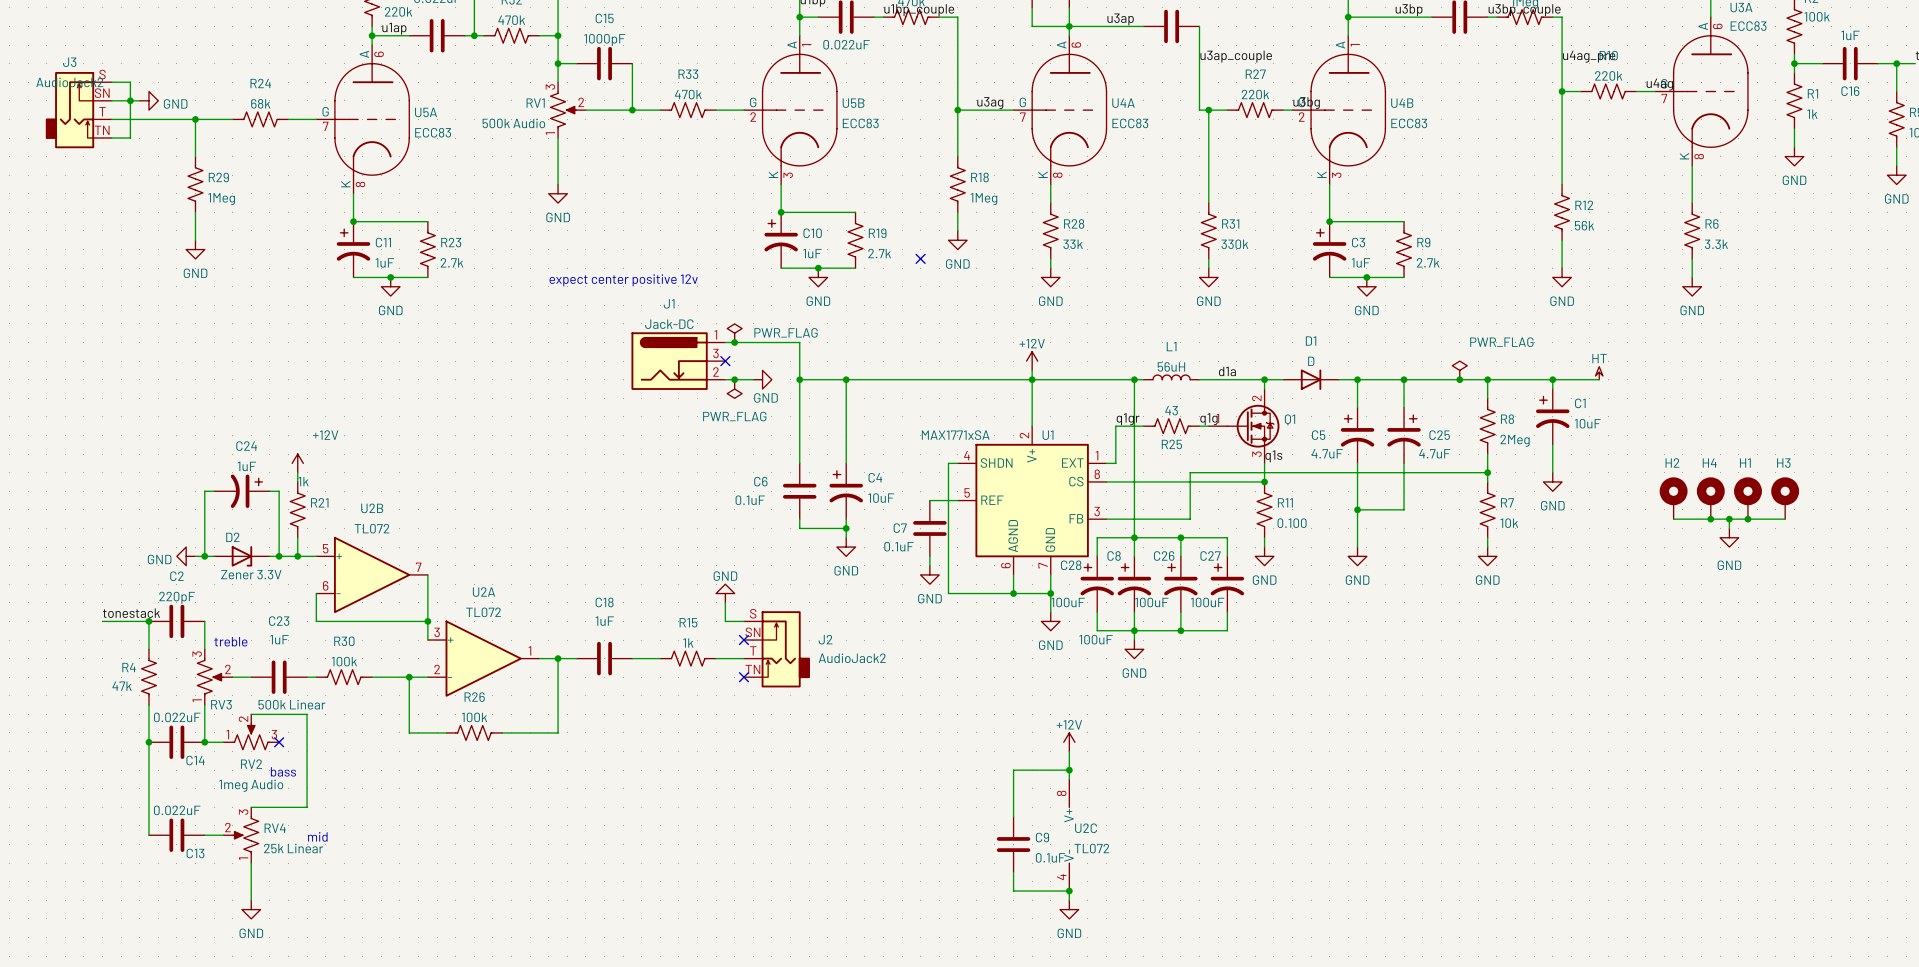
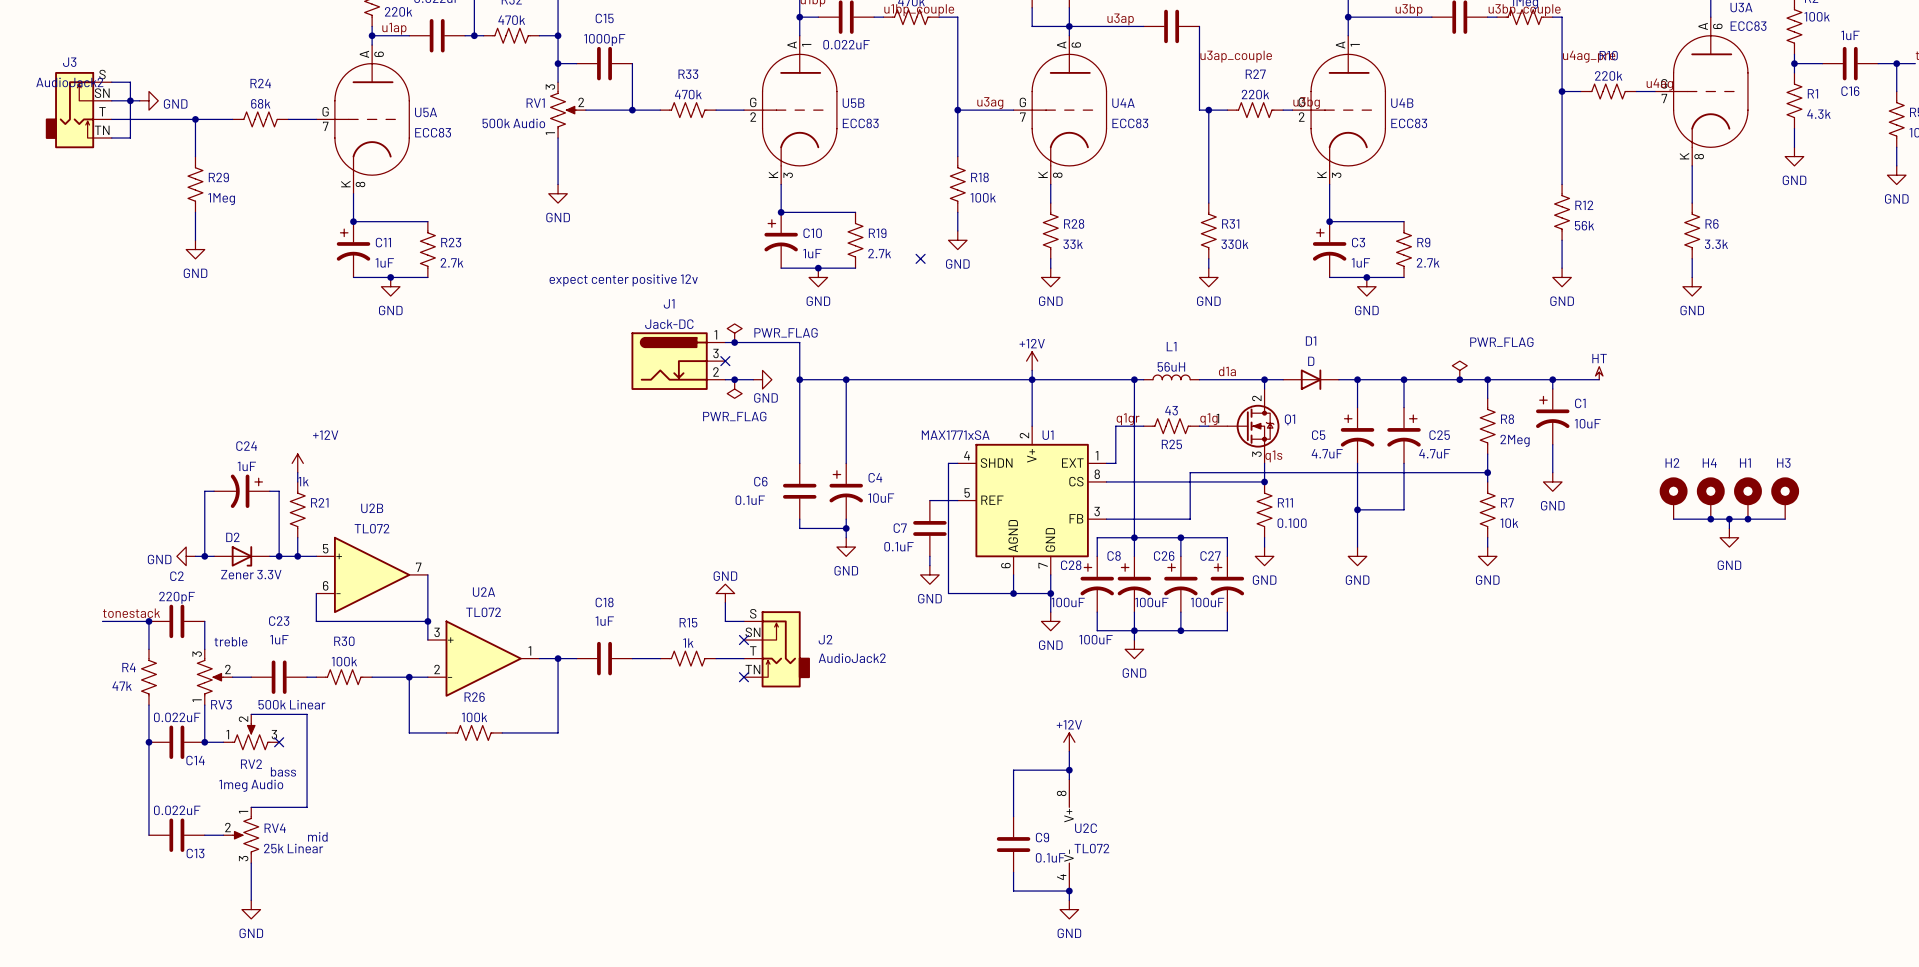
R1 value: 1k (1812, 114) -> 4.3k (1818, 114)
R18 value: 1Meg (983, 199) -> 100k (983, 197)
RV4 flip: as is (245, 835) -> up-down (245, 835)

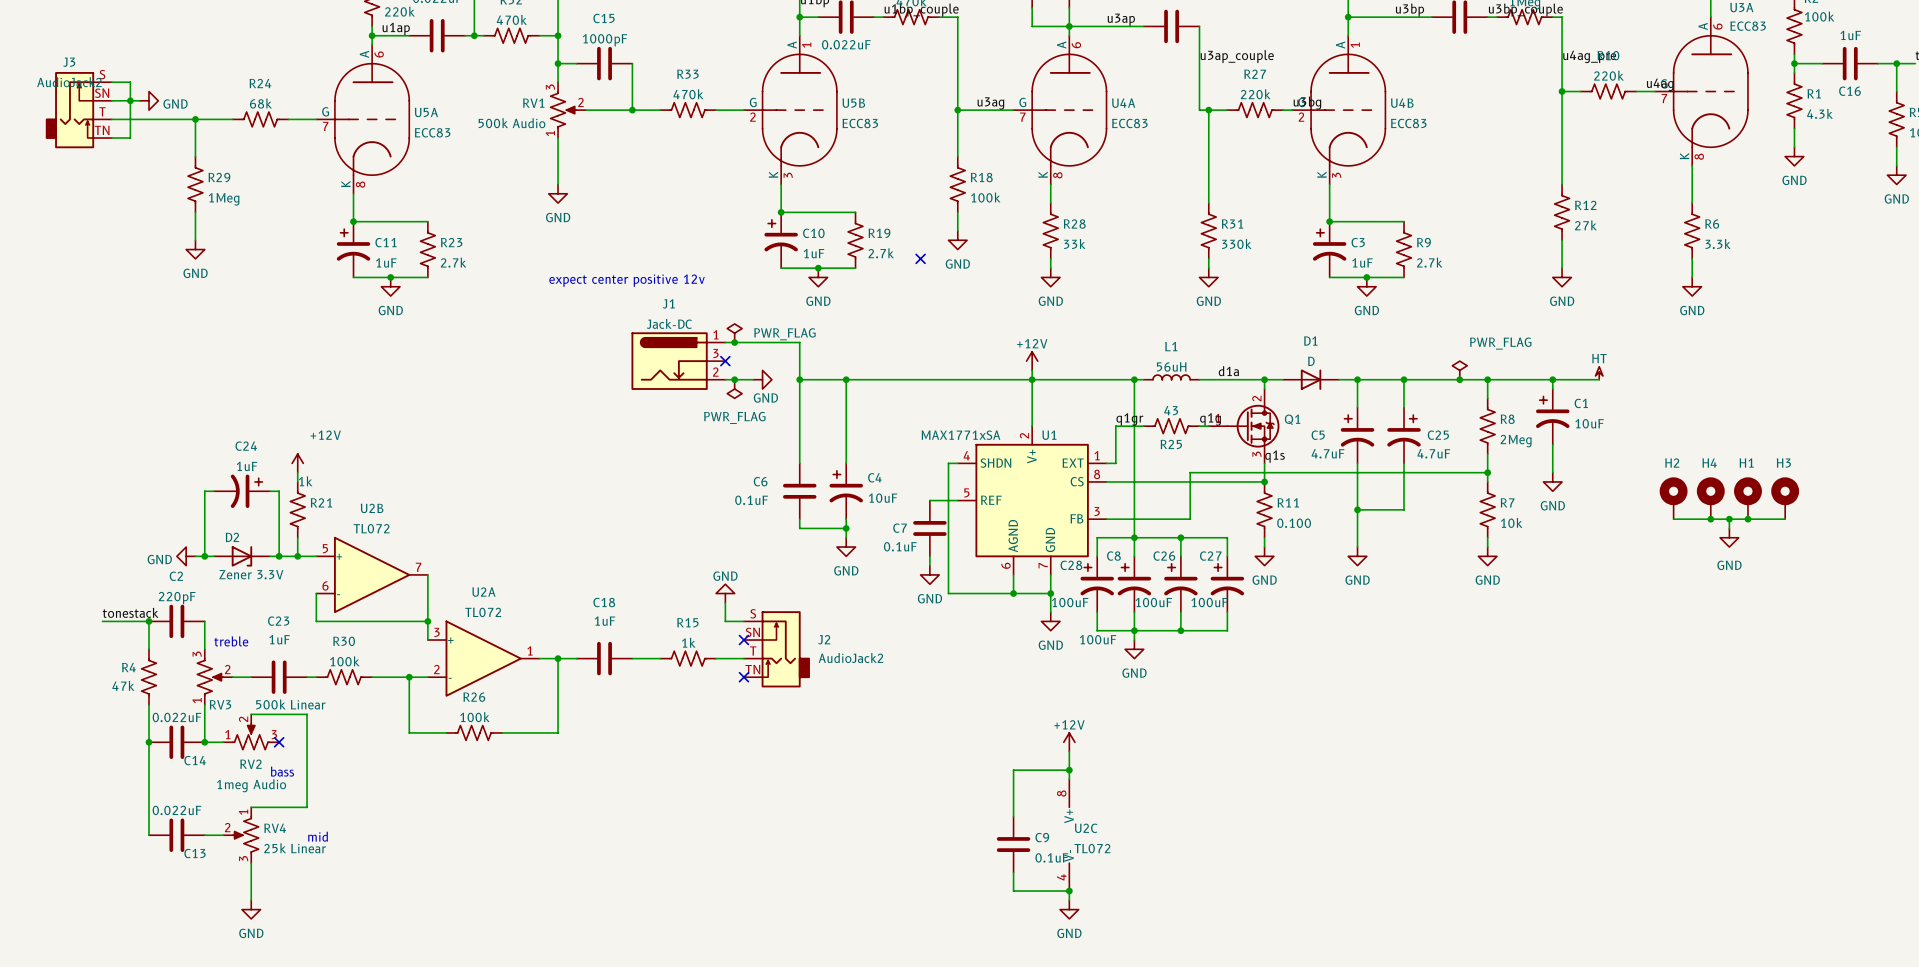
R12 value: 56k (1584, 225) -> 27k (1585, 225)

